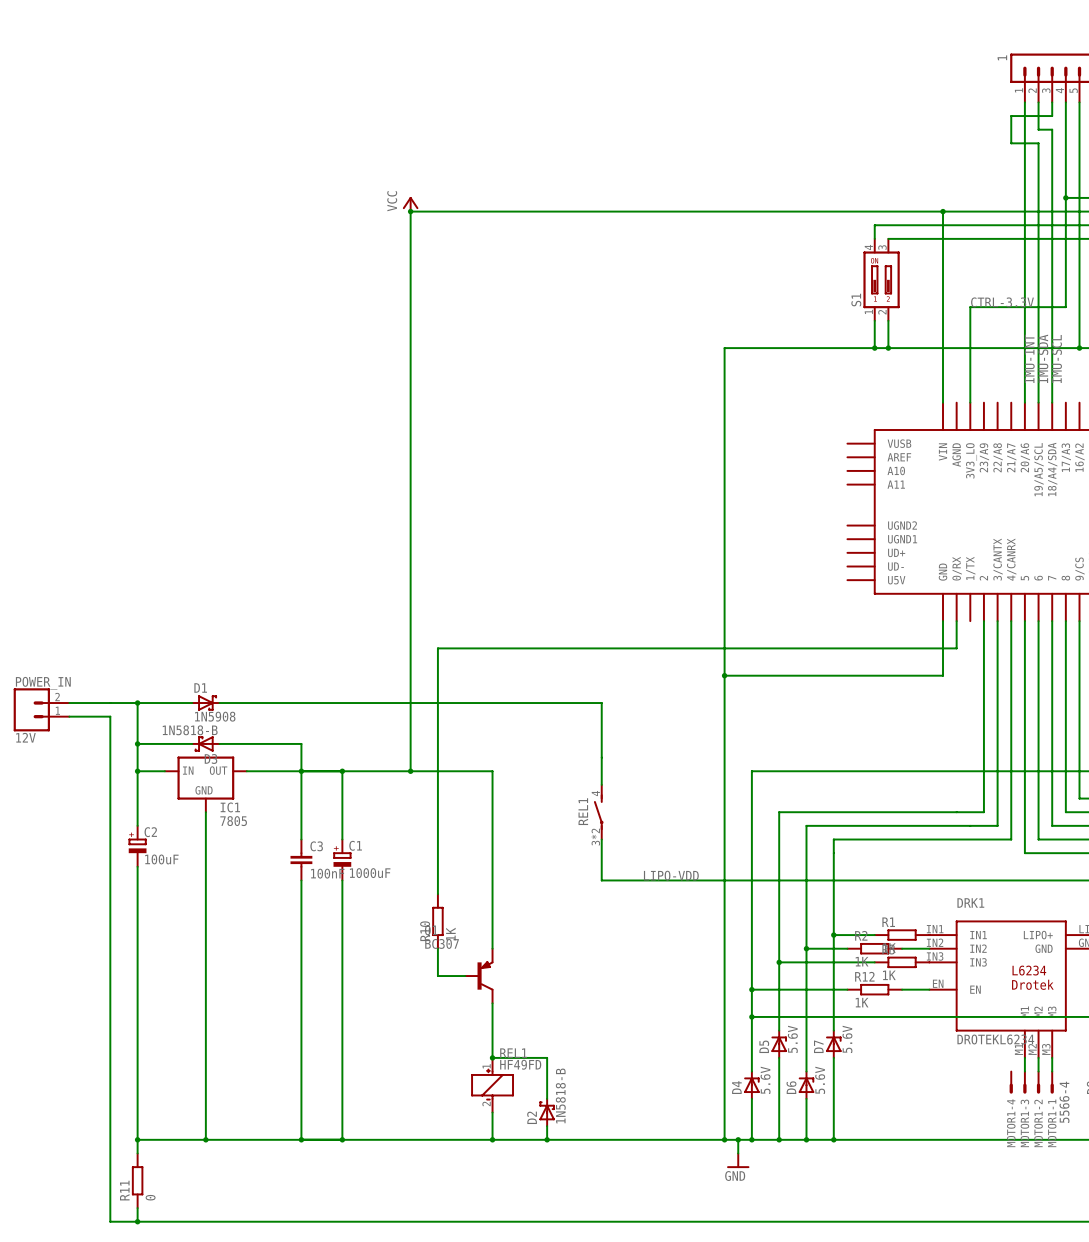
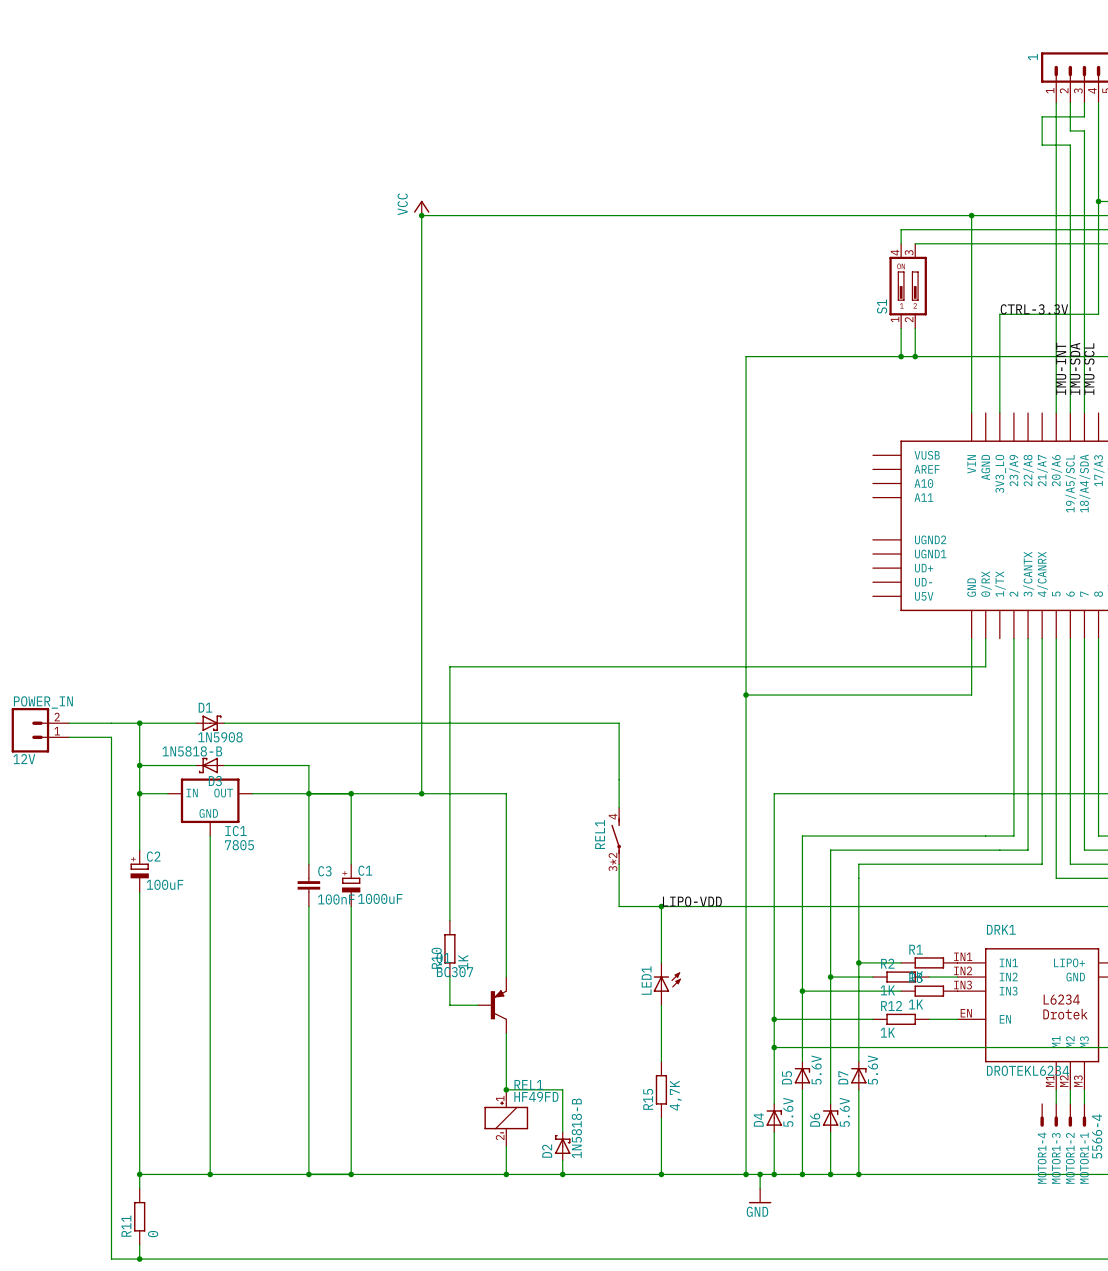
wire: none -> (661, 906) (661, 962)
junction: none -> (661, 906)
LED1: none -> (667, 984)
wire: none -> (661, 1005) (661, 1061)
R15: none -> 4,7K (661, 1089)
wire: none -> (661, 1118) (661, 1174)
junction: none -> (661, 1174)

